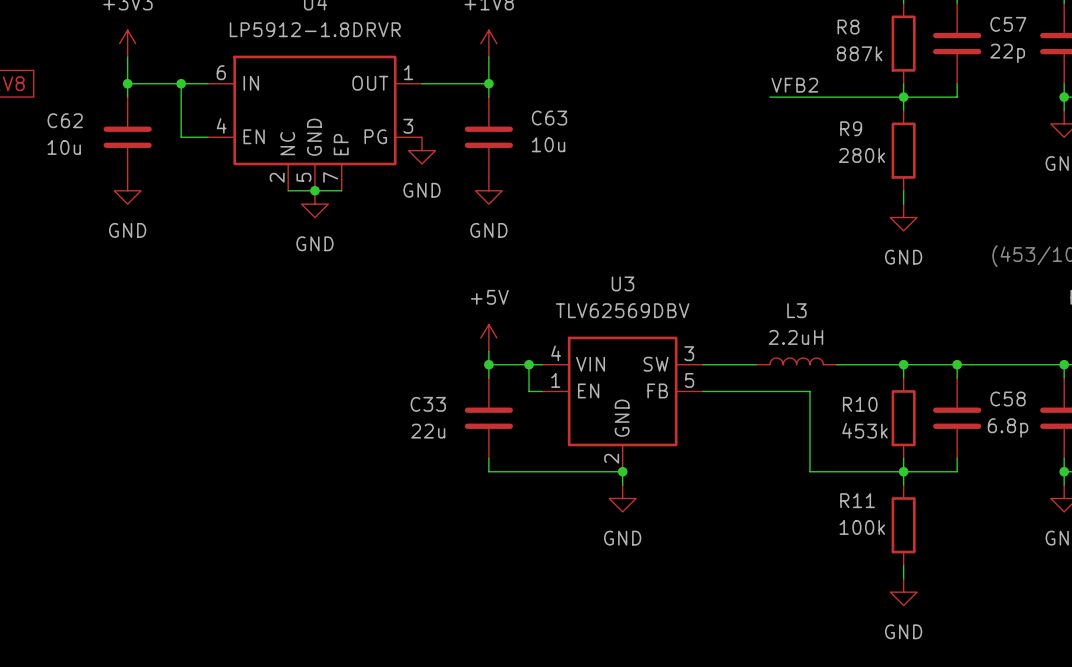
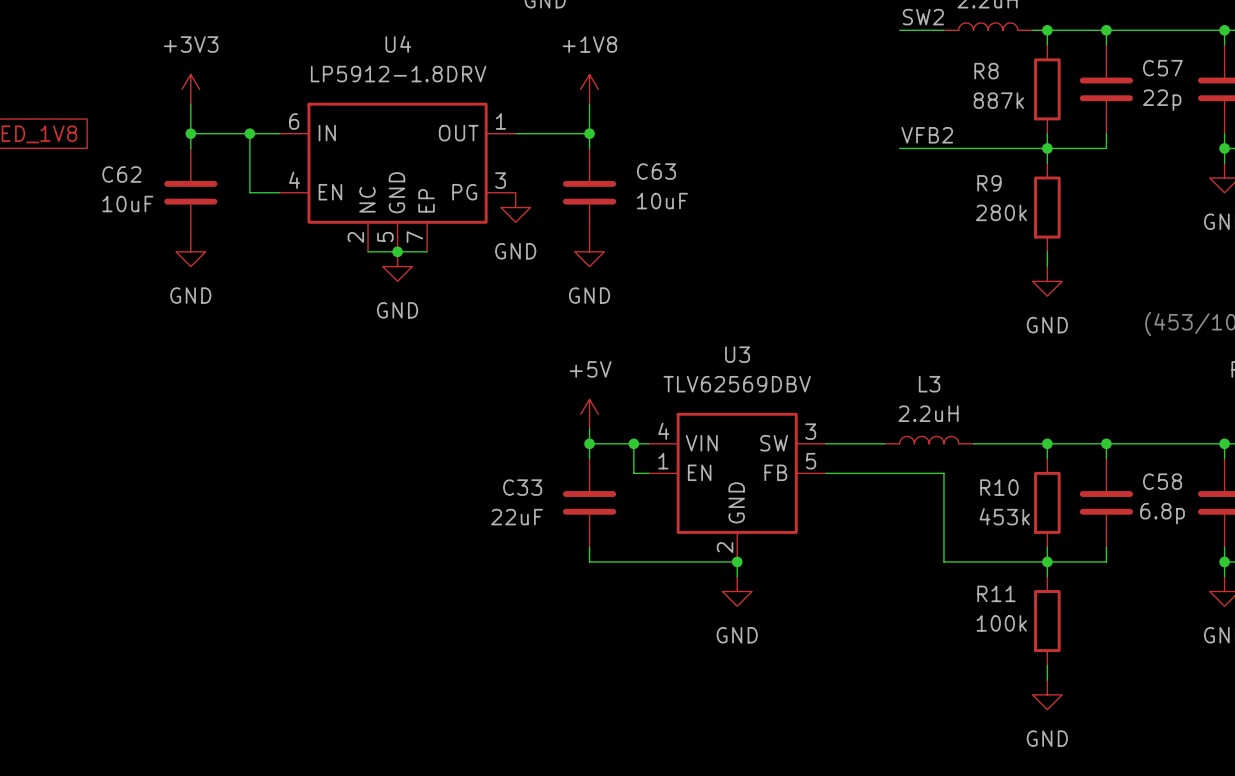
U4 value: LP5912-1.8DRVR (315, 29) -> LP5912-1.8DRV (398, 74)
C63 value: 10u (548, 144) -> 10uF (662, 201)
C62 value: 10u (64, 147) -> 10uF (127, 204)
C33 value: 22u (428, 431) -> 22uF (517, 517)

